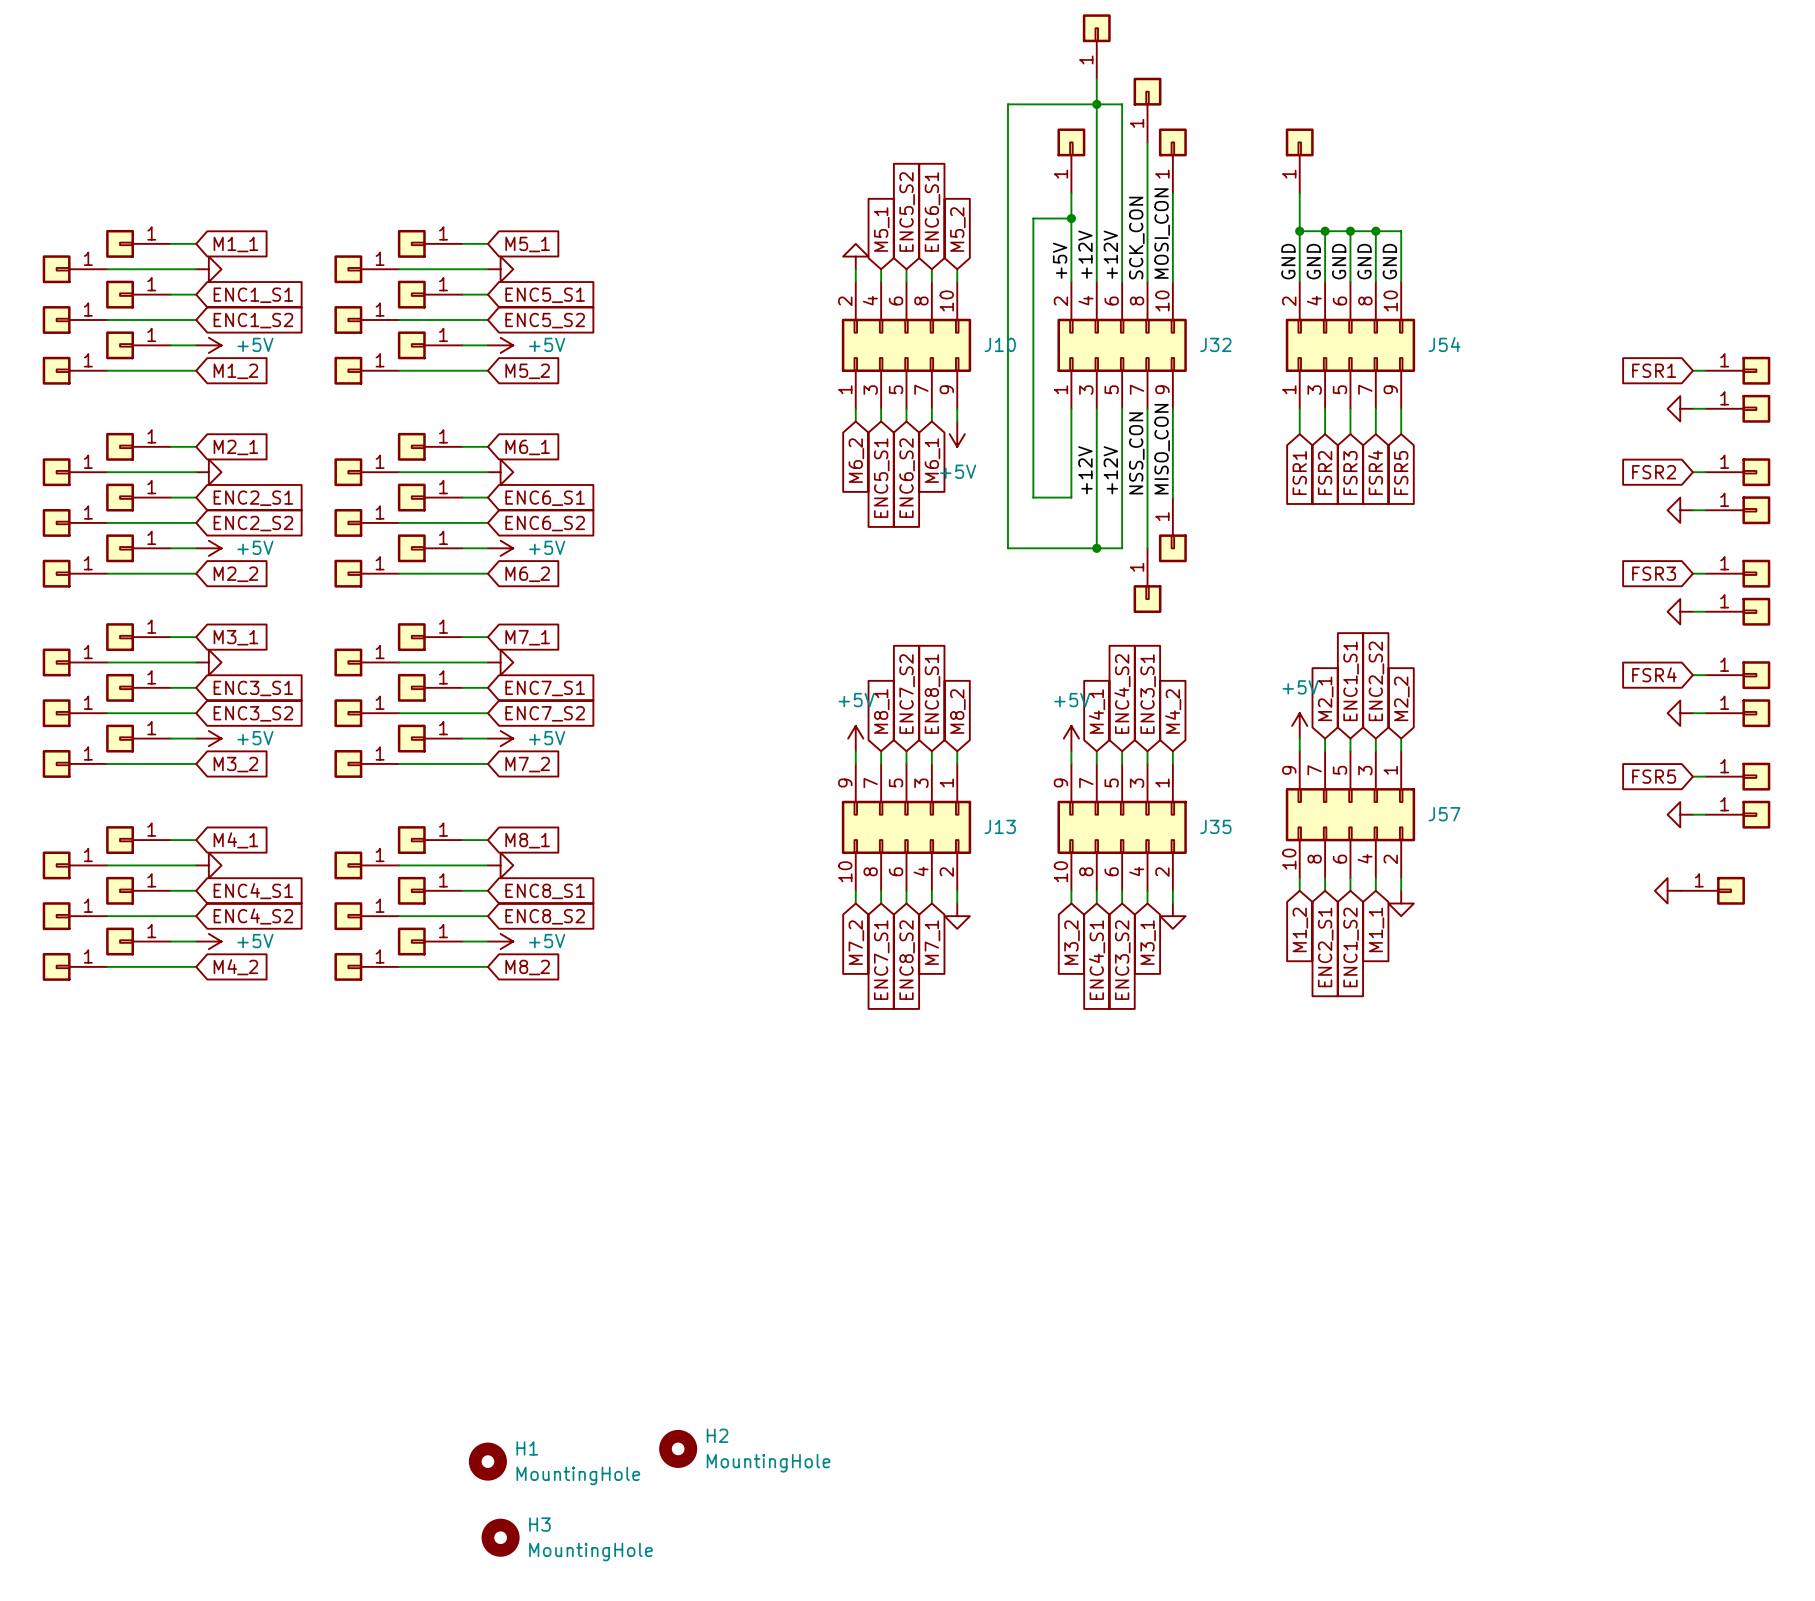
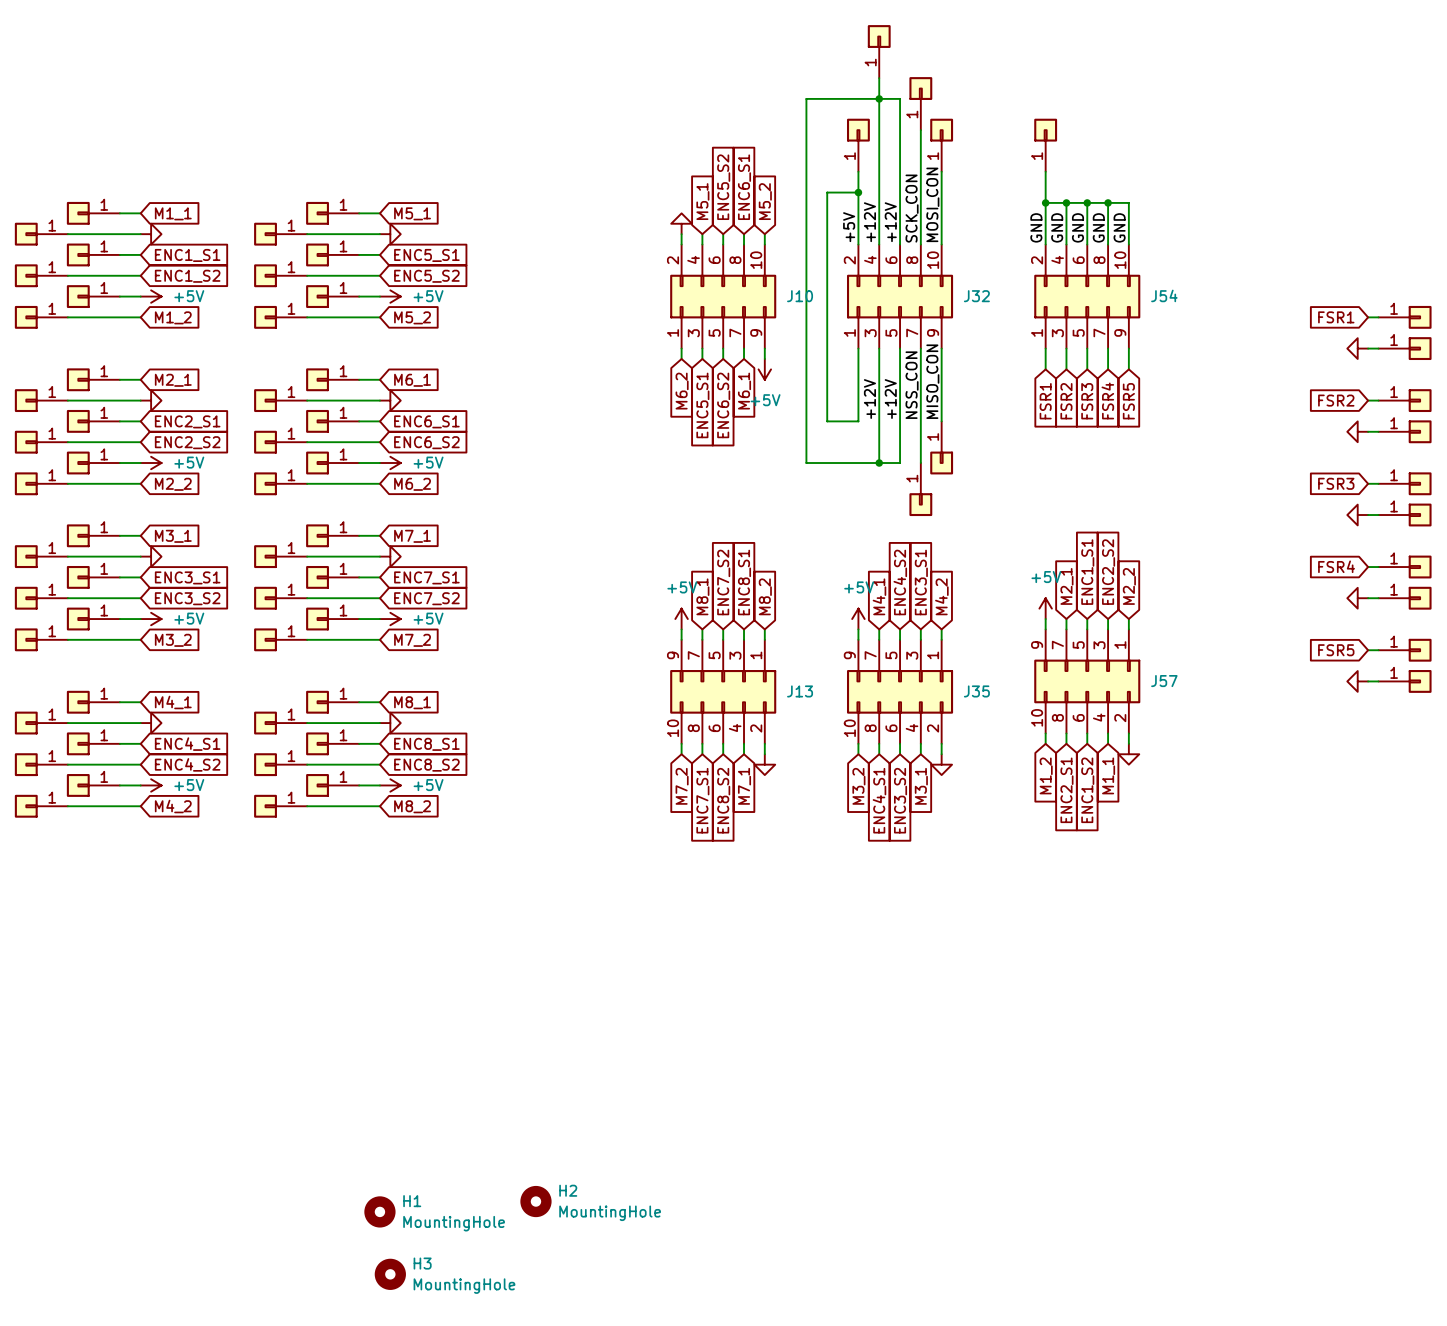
power symbol: (1667, 890) -> none
part: (1712, 890) -> none

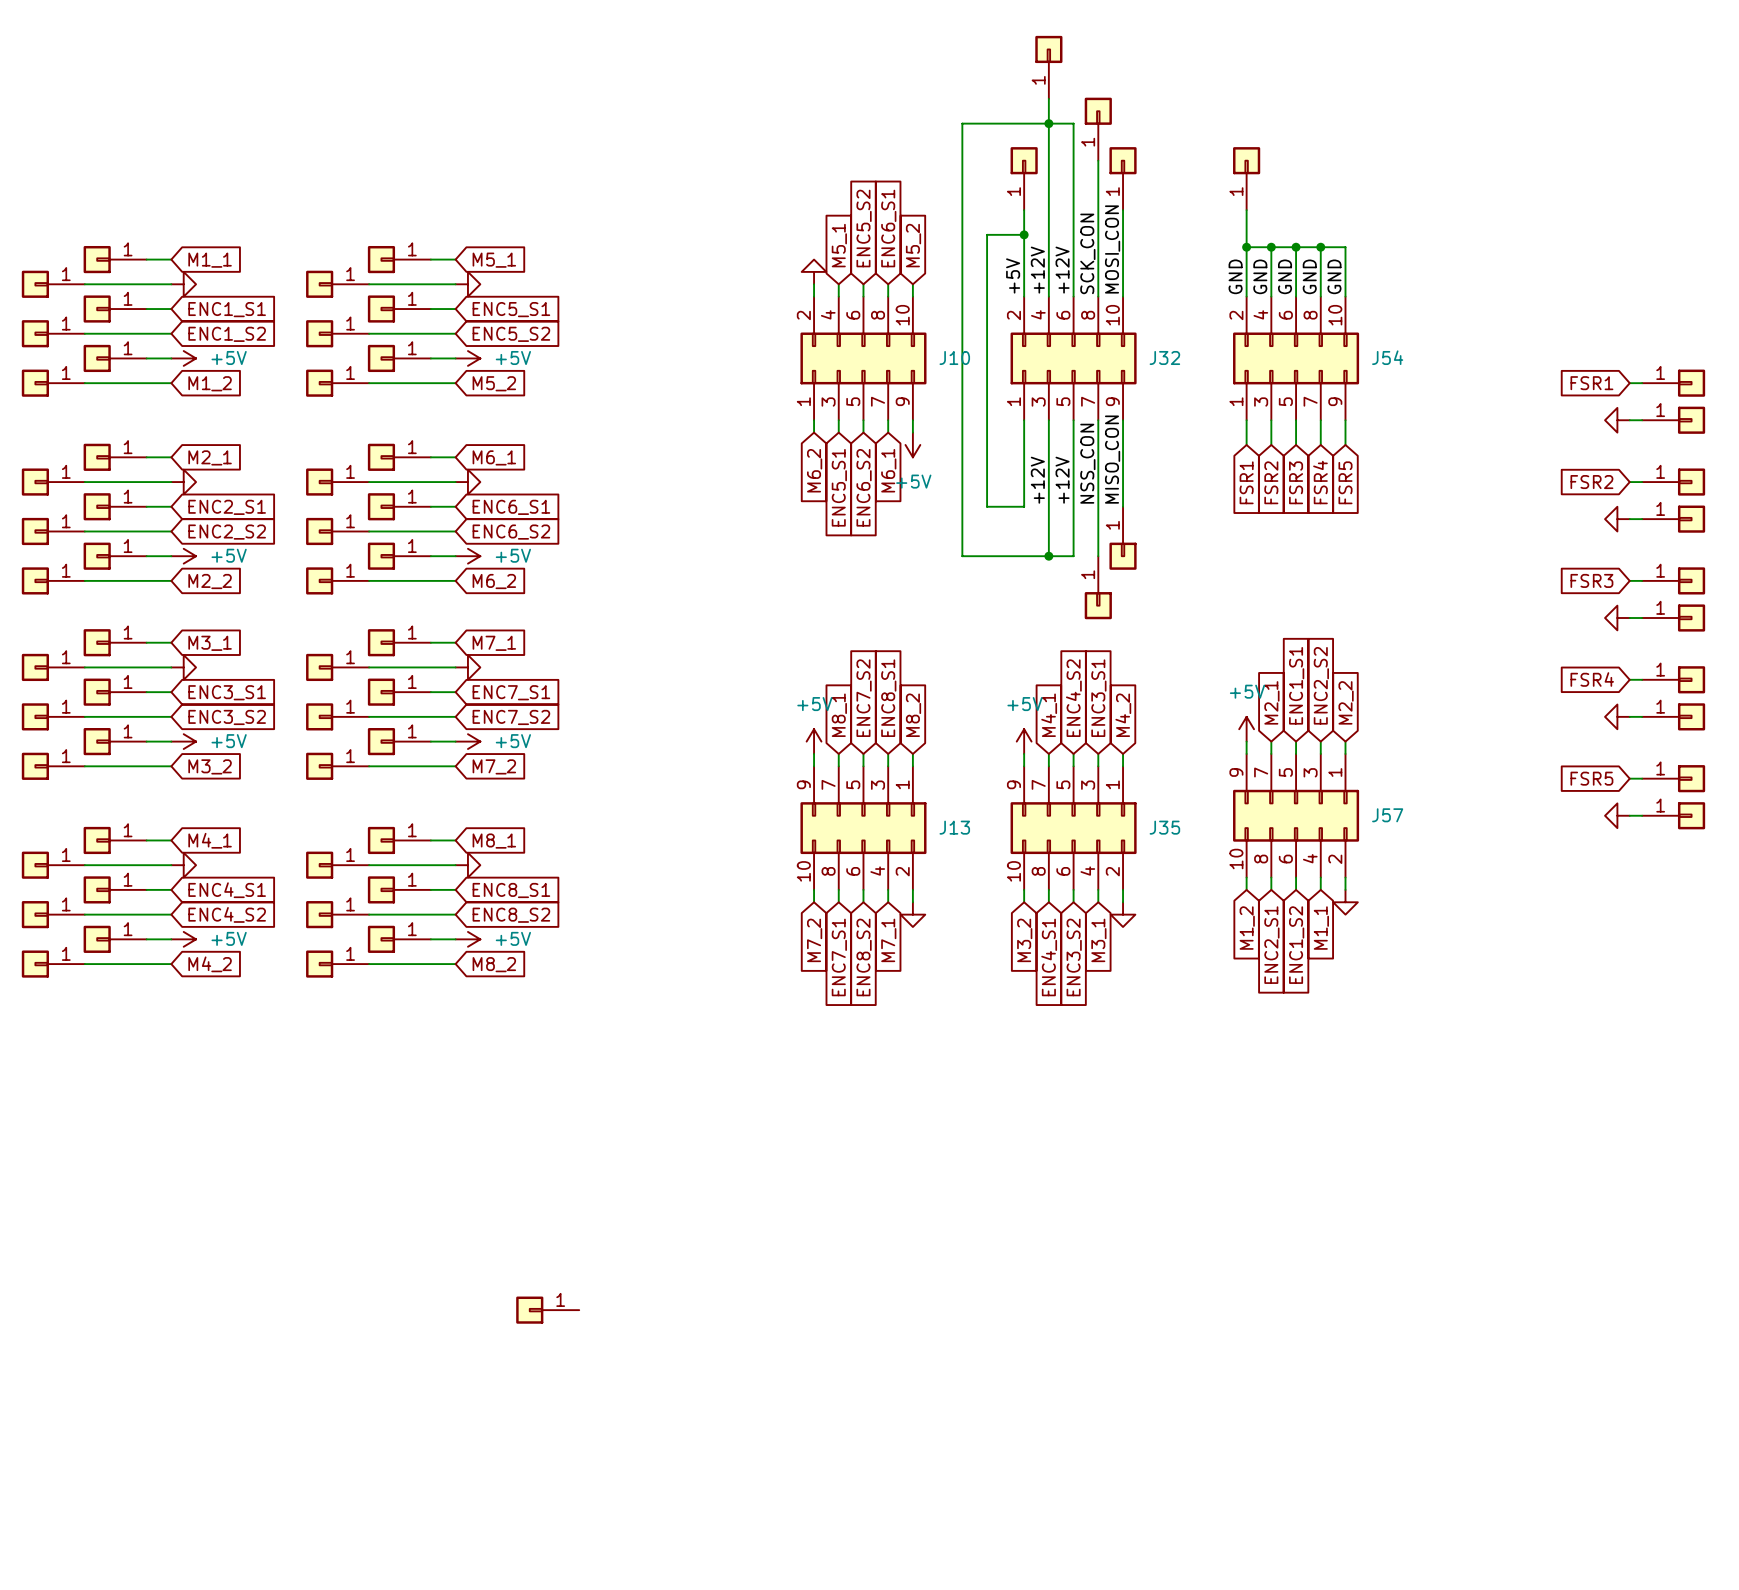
part: none -> (547, 1310)
H2: MountingHole (535, 1201) -> none
H1: MountingHole (379, 1211) -> none
H3: MountingHole (390, 1274) -> none

